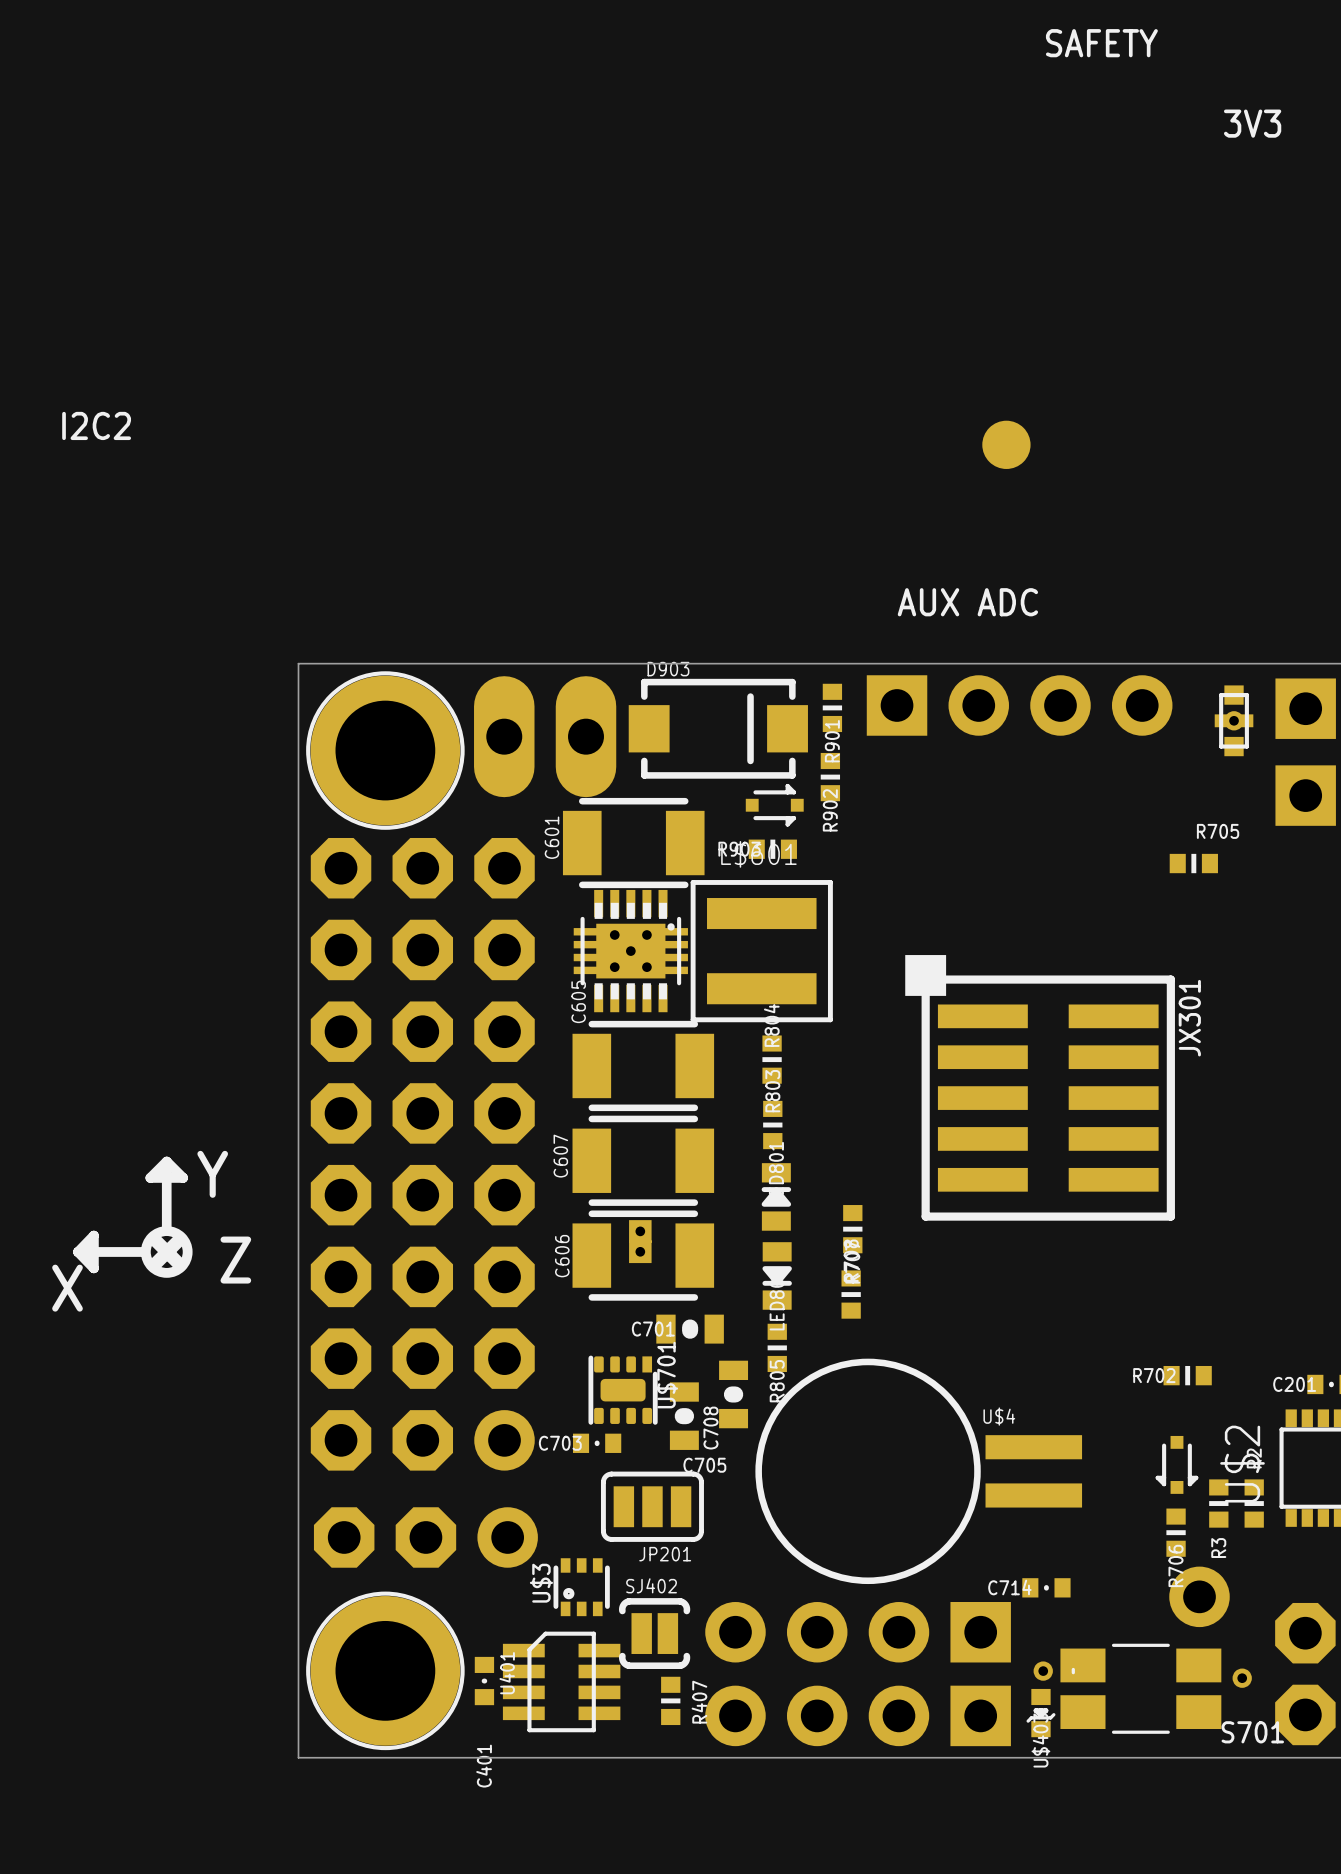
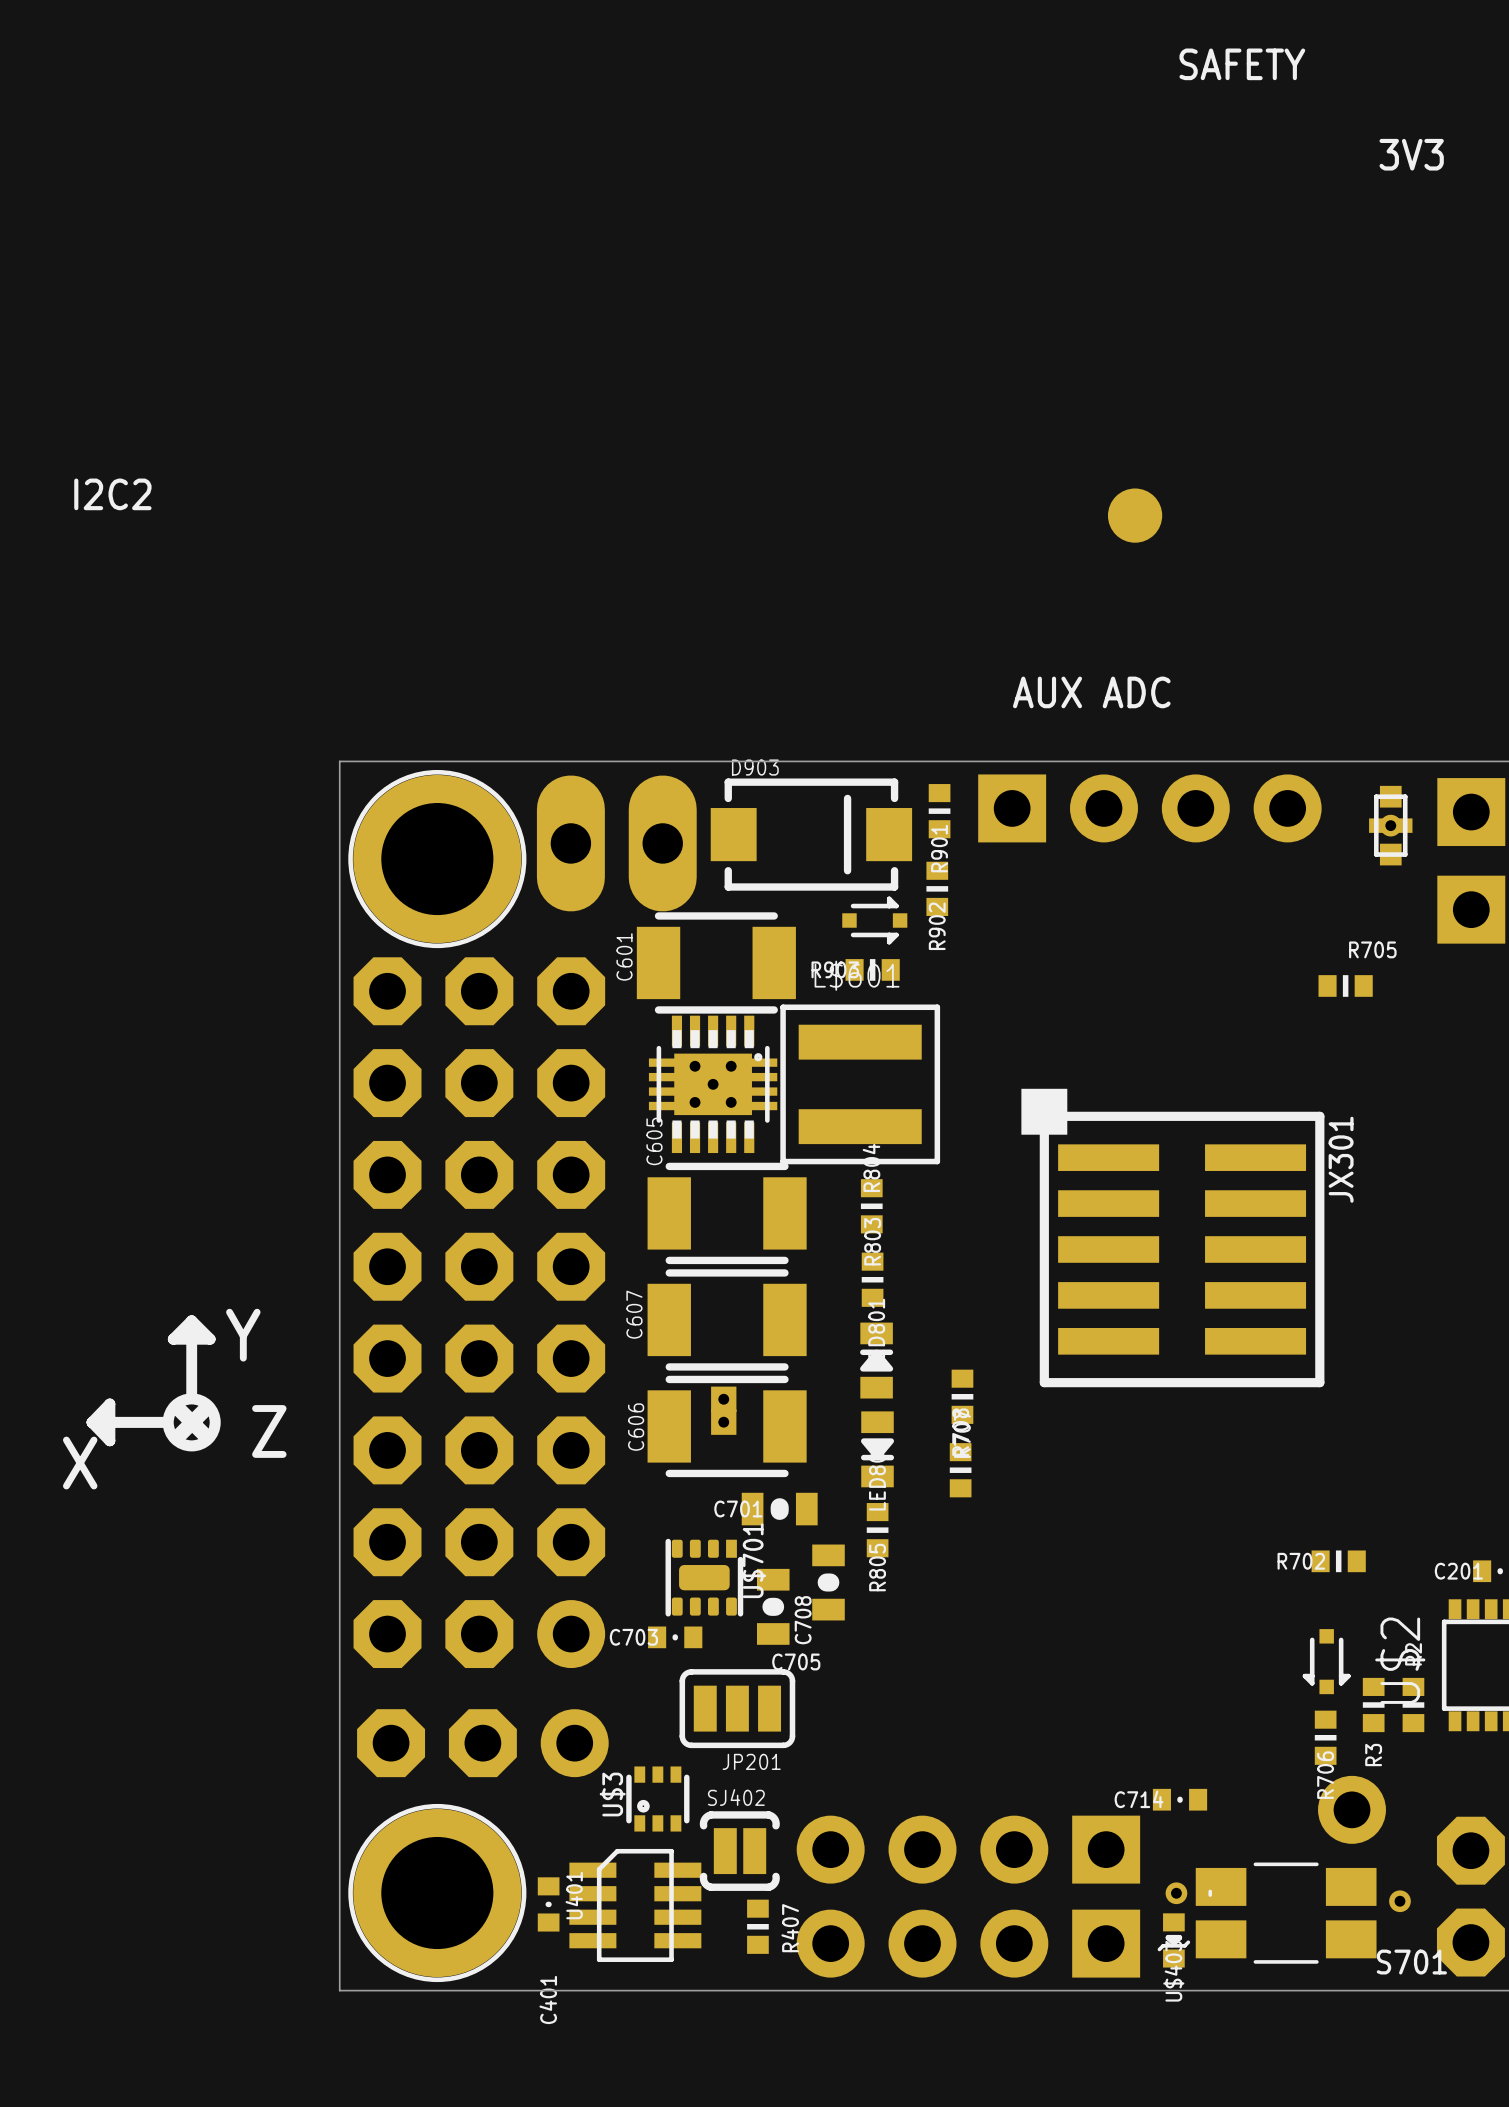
U$4: (918, 1471) -> none

